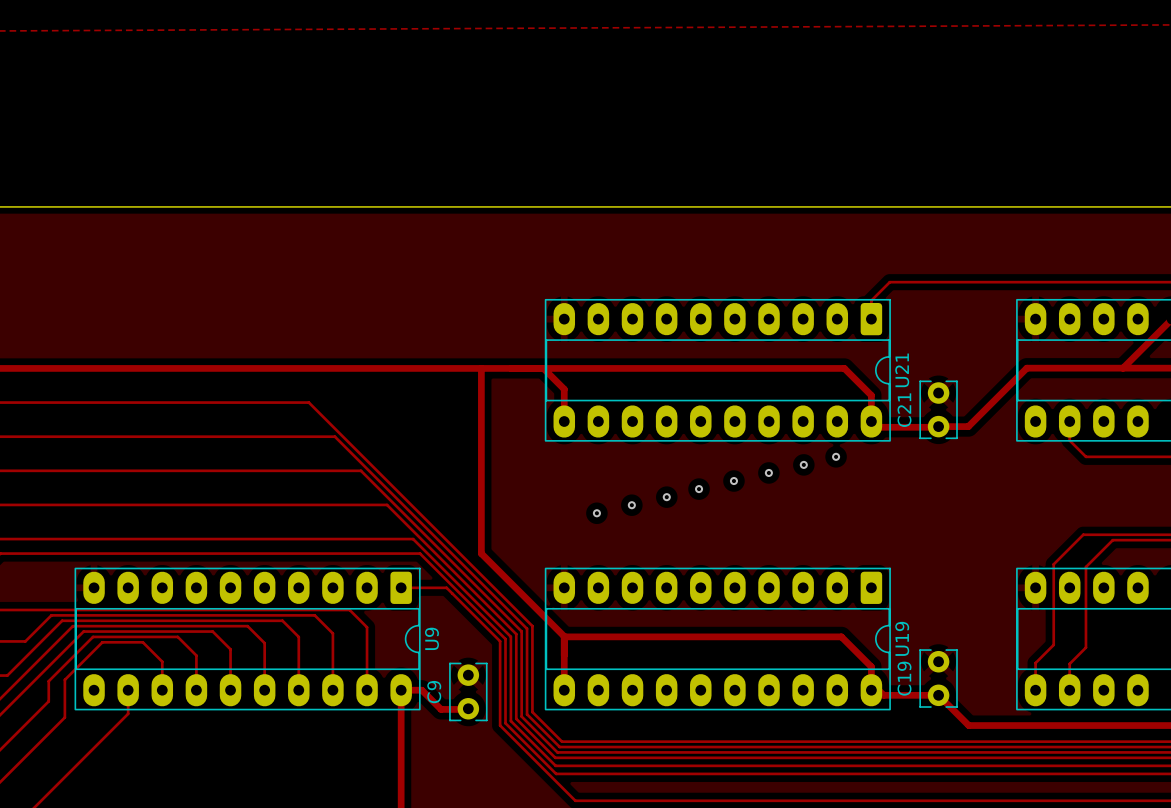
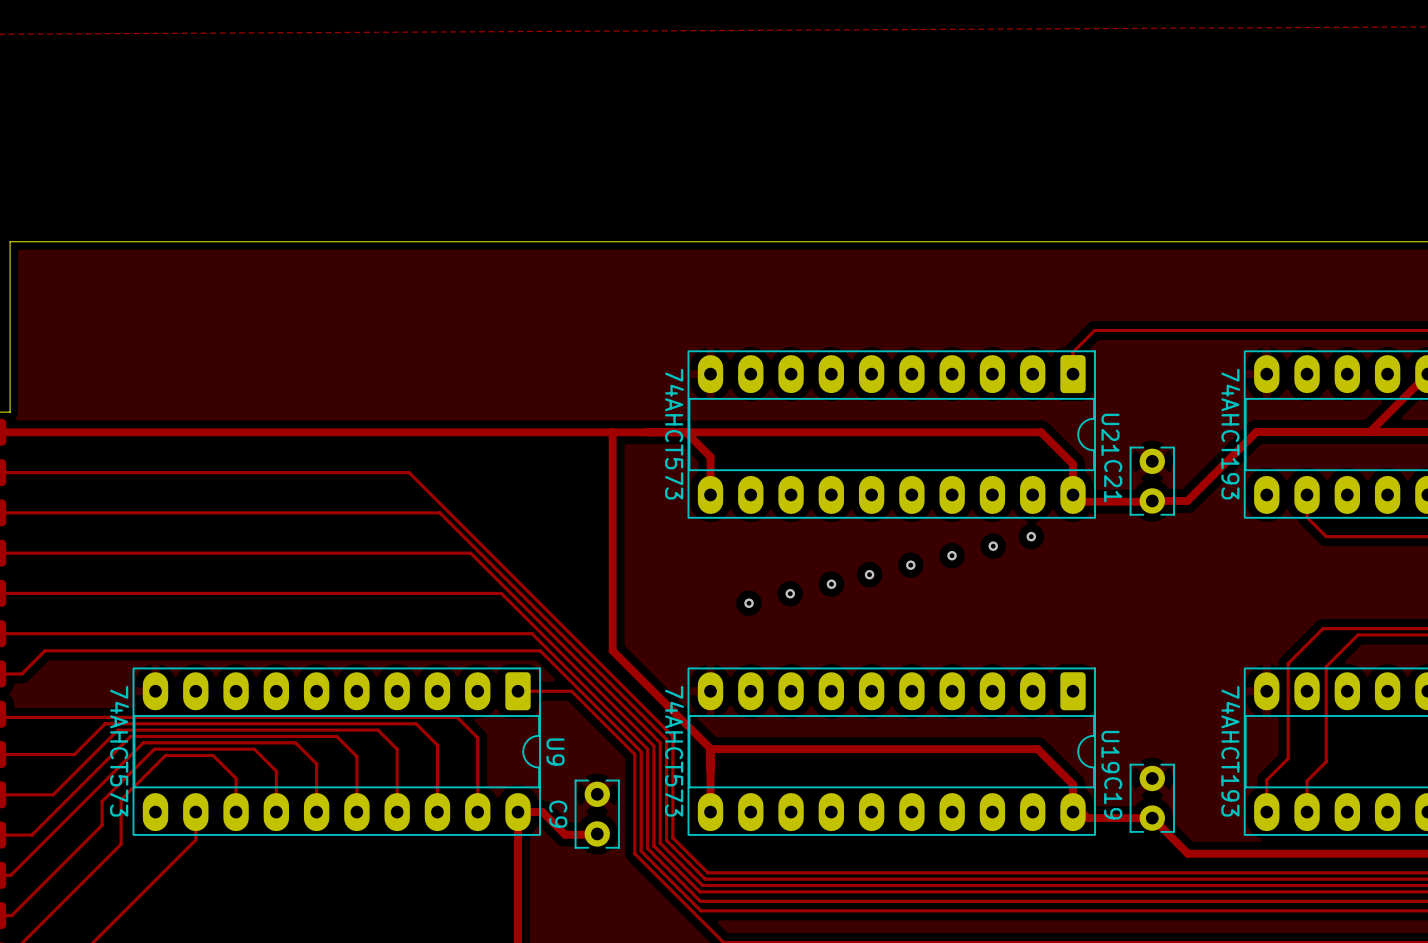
U21 value: none -> 74AHCT573 (674, 434)
U21 name rotation: 0° (902, 370) -> 180° (1110, 434)
part value: none -> 74AHCT193 (1230, 434)
C21 name rotation: 0° (904, 410) -> 180° (1113, 481)
U9 name rotation: 0° (431, 638) -> 180° (555, 752)
U19 name rotation: 0° (902, 638) -> 180° (1110, 752)
U9 value: none -> 74AHCT573 (119, 751)
U19 value: none -> 74AHCT573 (674, 751)
part value: none -> 74AHCT193 (1230, 751)
C19 name rotation: 0° (904, 678) -> 180° (1113, 798)
C9 name rotation: 0° (434, 692) -> 180° (558, 814)

